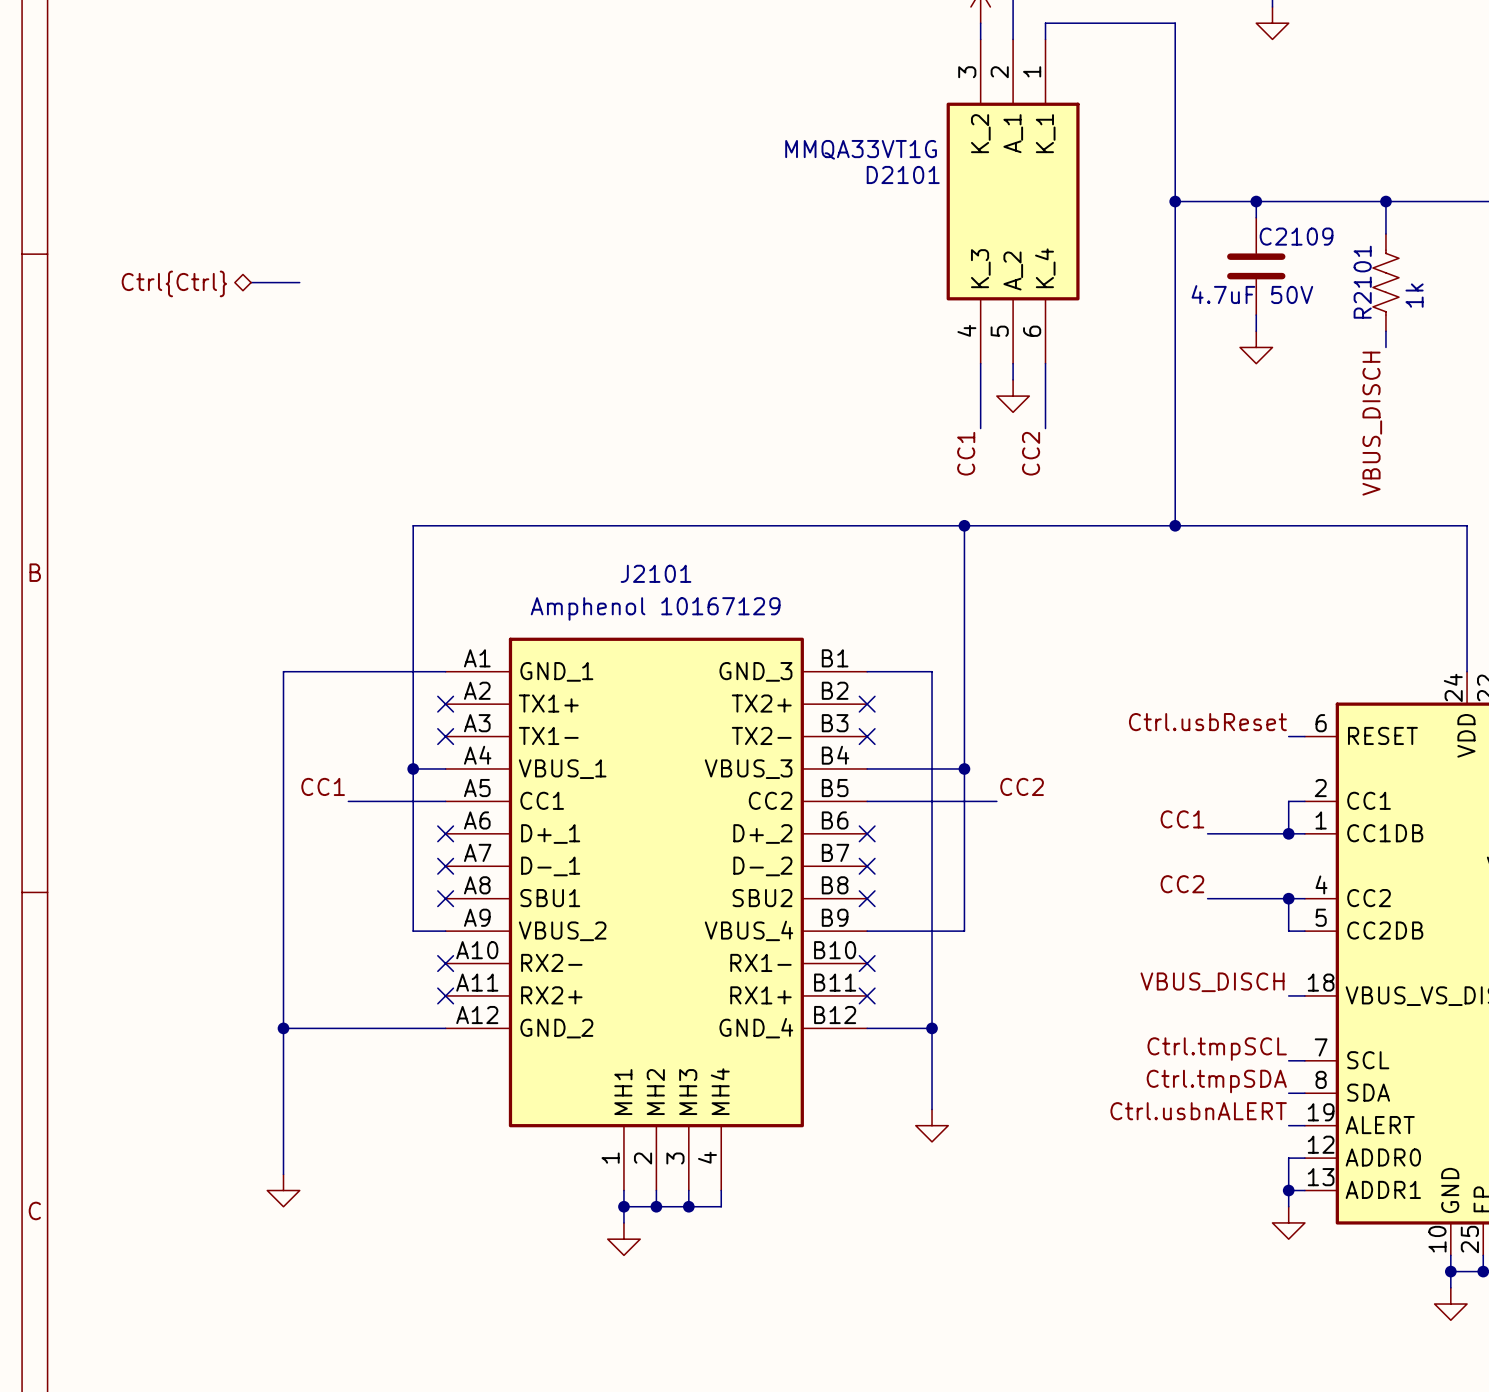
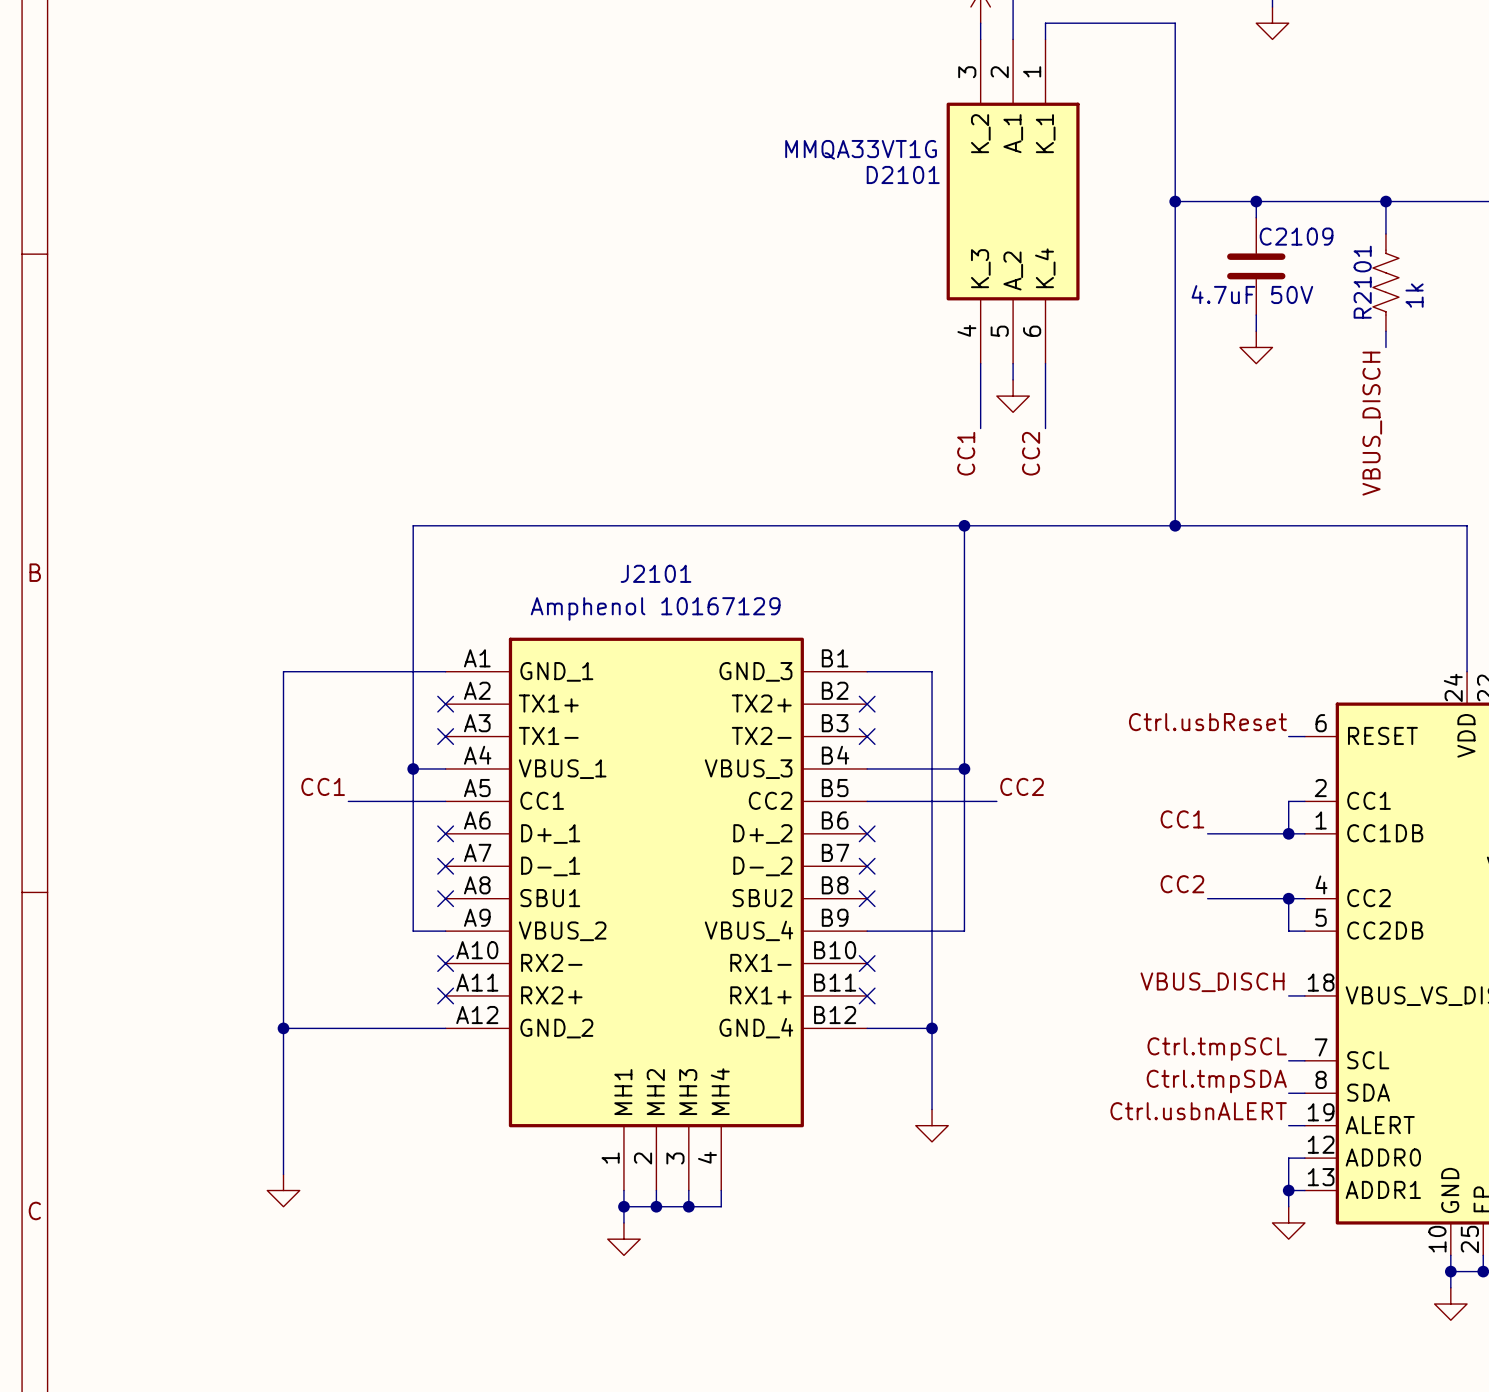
bus: (251, 282) (299, 282) -> none
hierarchical label: Ctrl{Ctrl} (174, 283) -> none

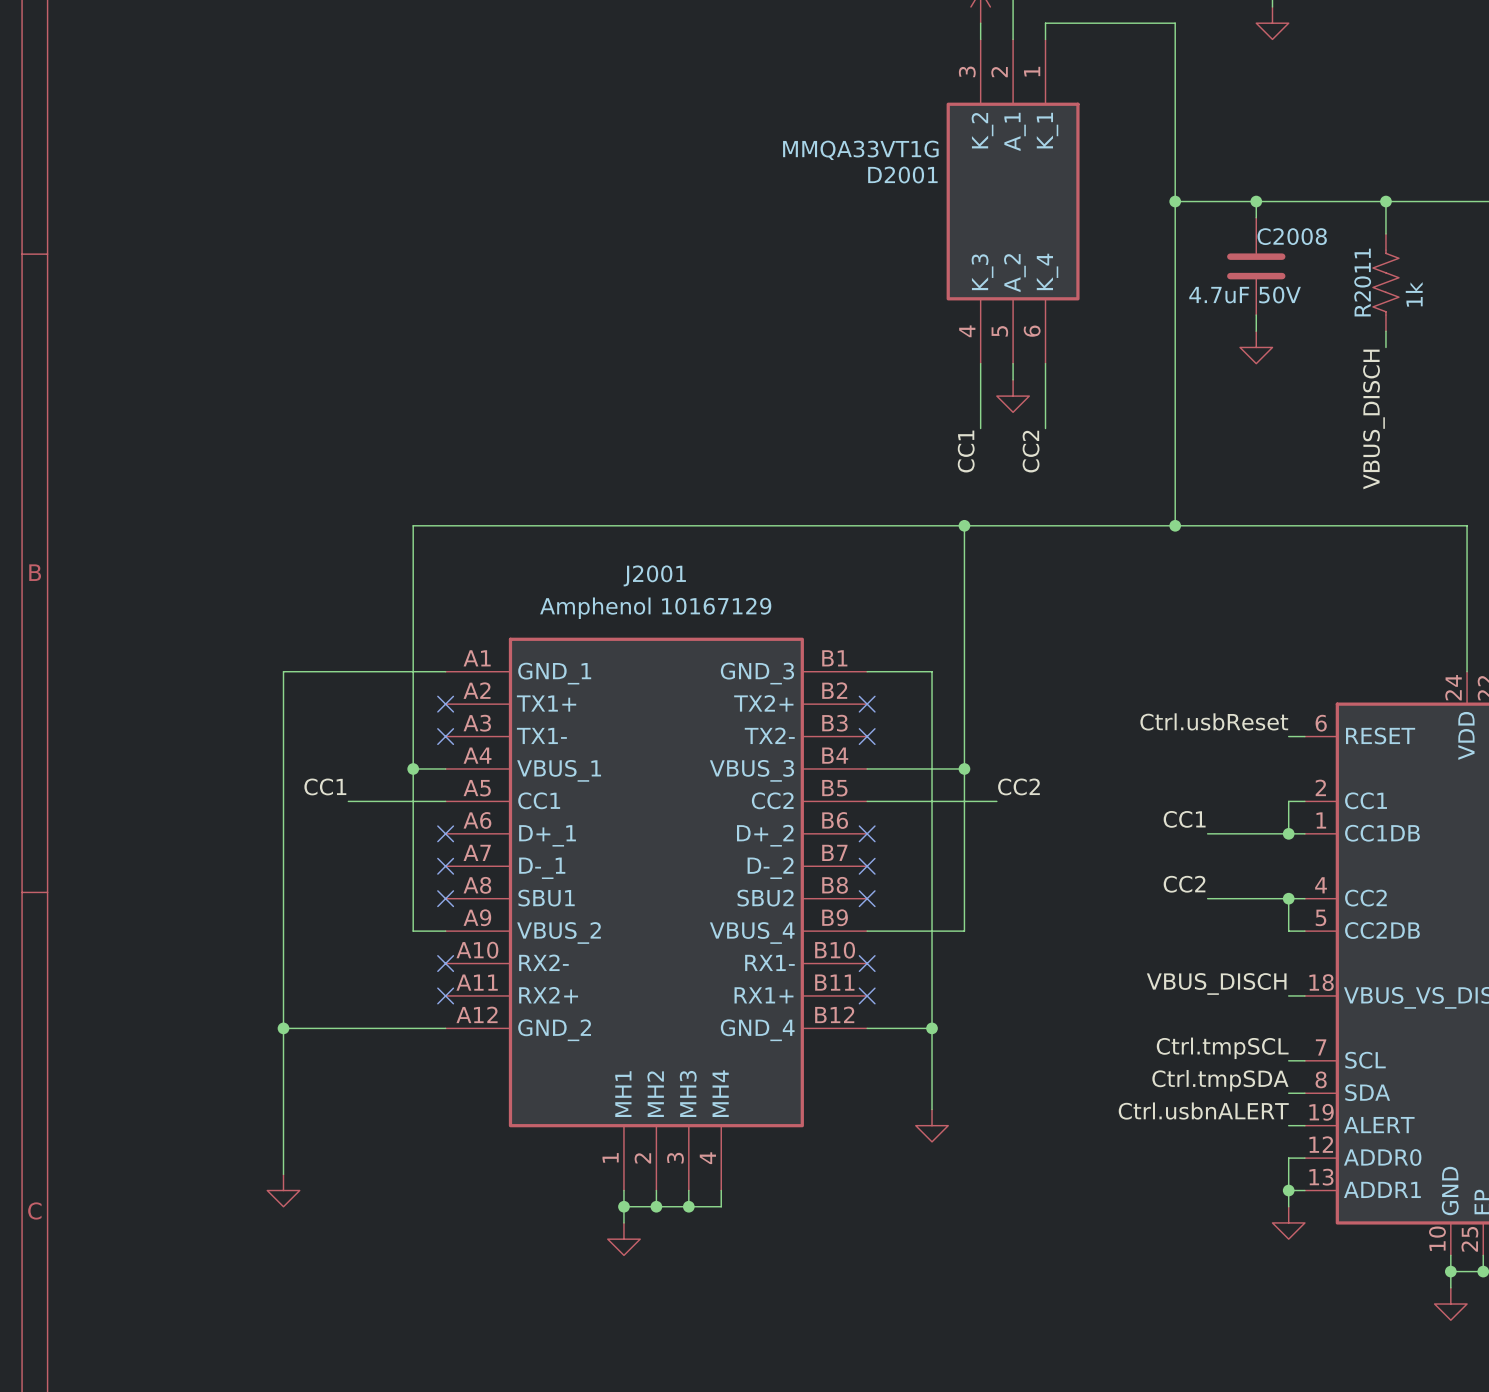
D2101 name: D2101 (903, 174) -> D2001 (902, 175)
C2109 name: C2109 (1296, 236) -> C2008 (1292, 236)
R2101 name: R2101 (1362, 282) -> R2011 (1362, 282)
J2101 name: J2101 (656, 573) -> J2001 (654, 575)

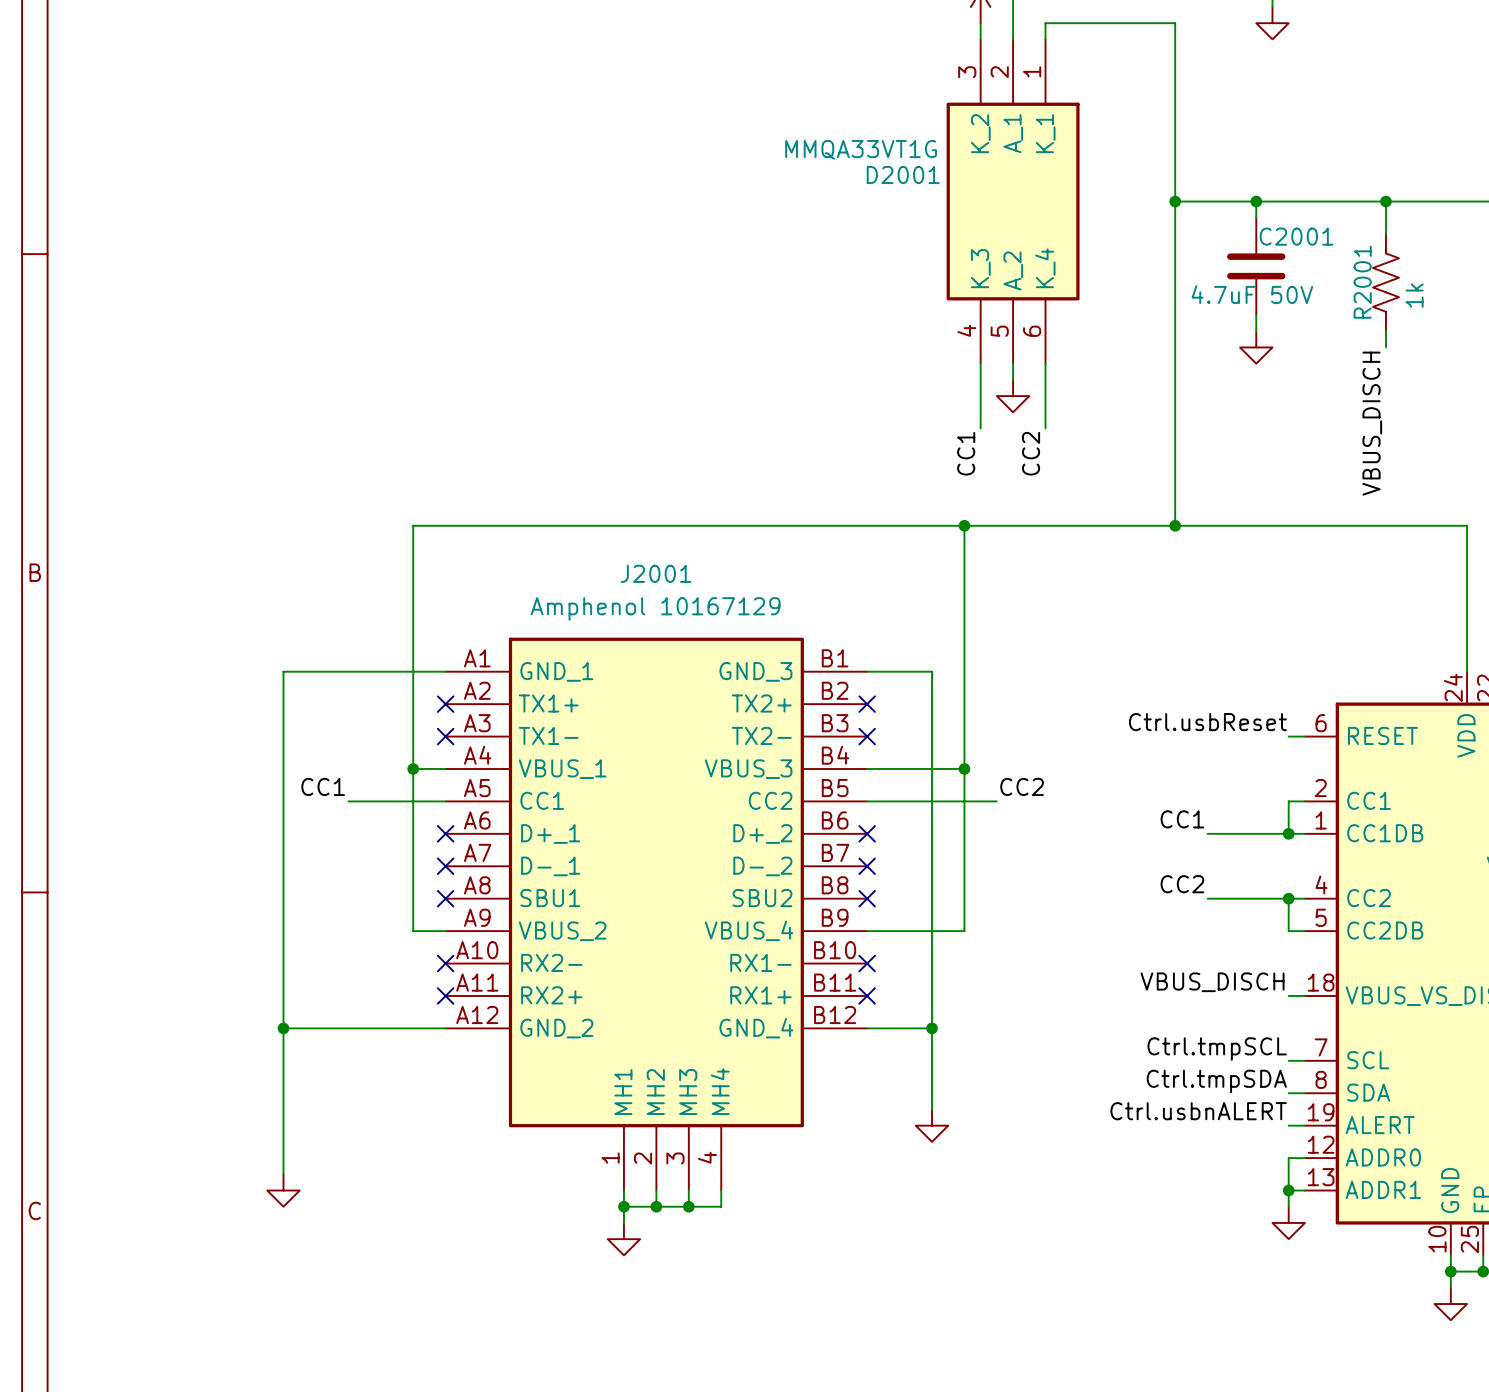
C2008 name: C2008 (1292, 236) -> C2001 (1296, 236)
R2011 name: R2011 (1362, 282) -> R2001 (1362, 282)

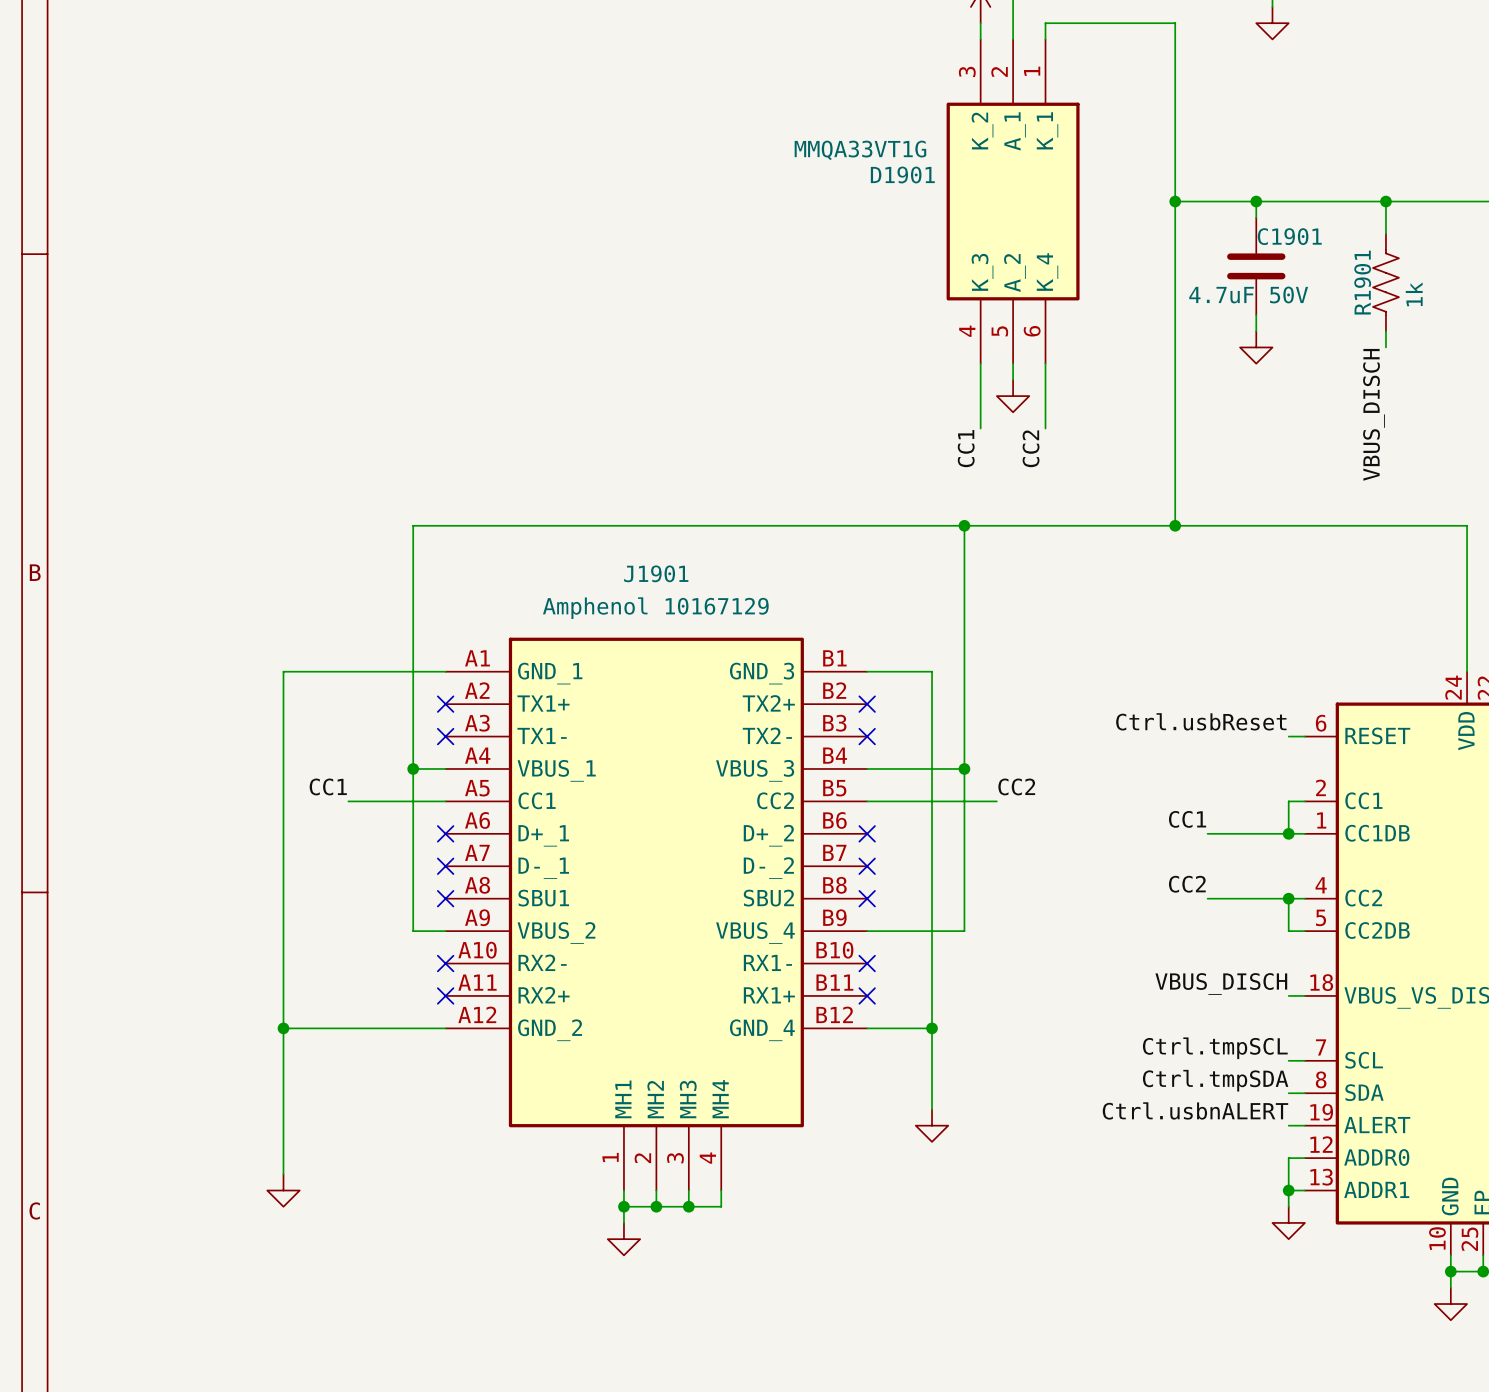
D2001 name: D2001 (903, 174) -> D1901 (902, 175)
C2001 name: C2001 (1296, 236) -> C1901 (1289, 236)
R2001 name: R2001 (1362, 282) -> R1901 (1362, 282)
J2001 name: J2001 (656, 573) -> J1901 (656, 573)

